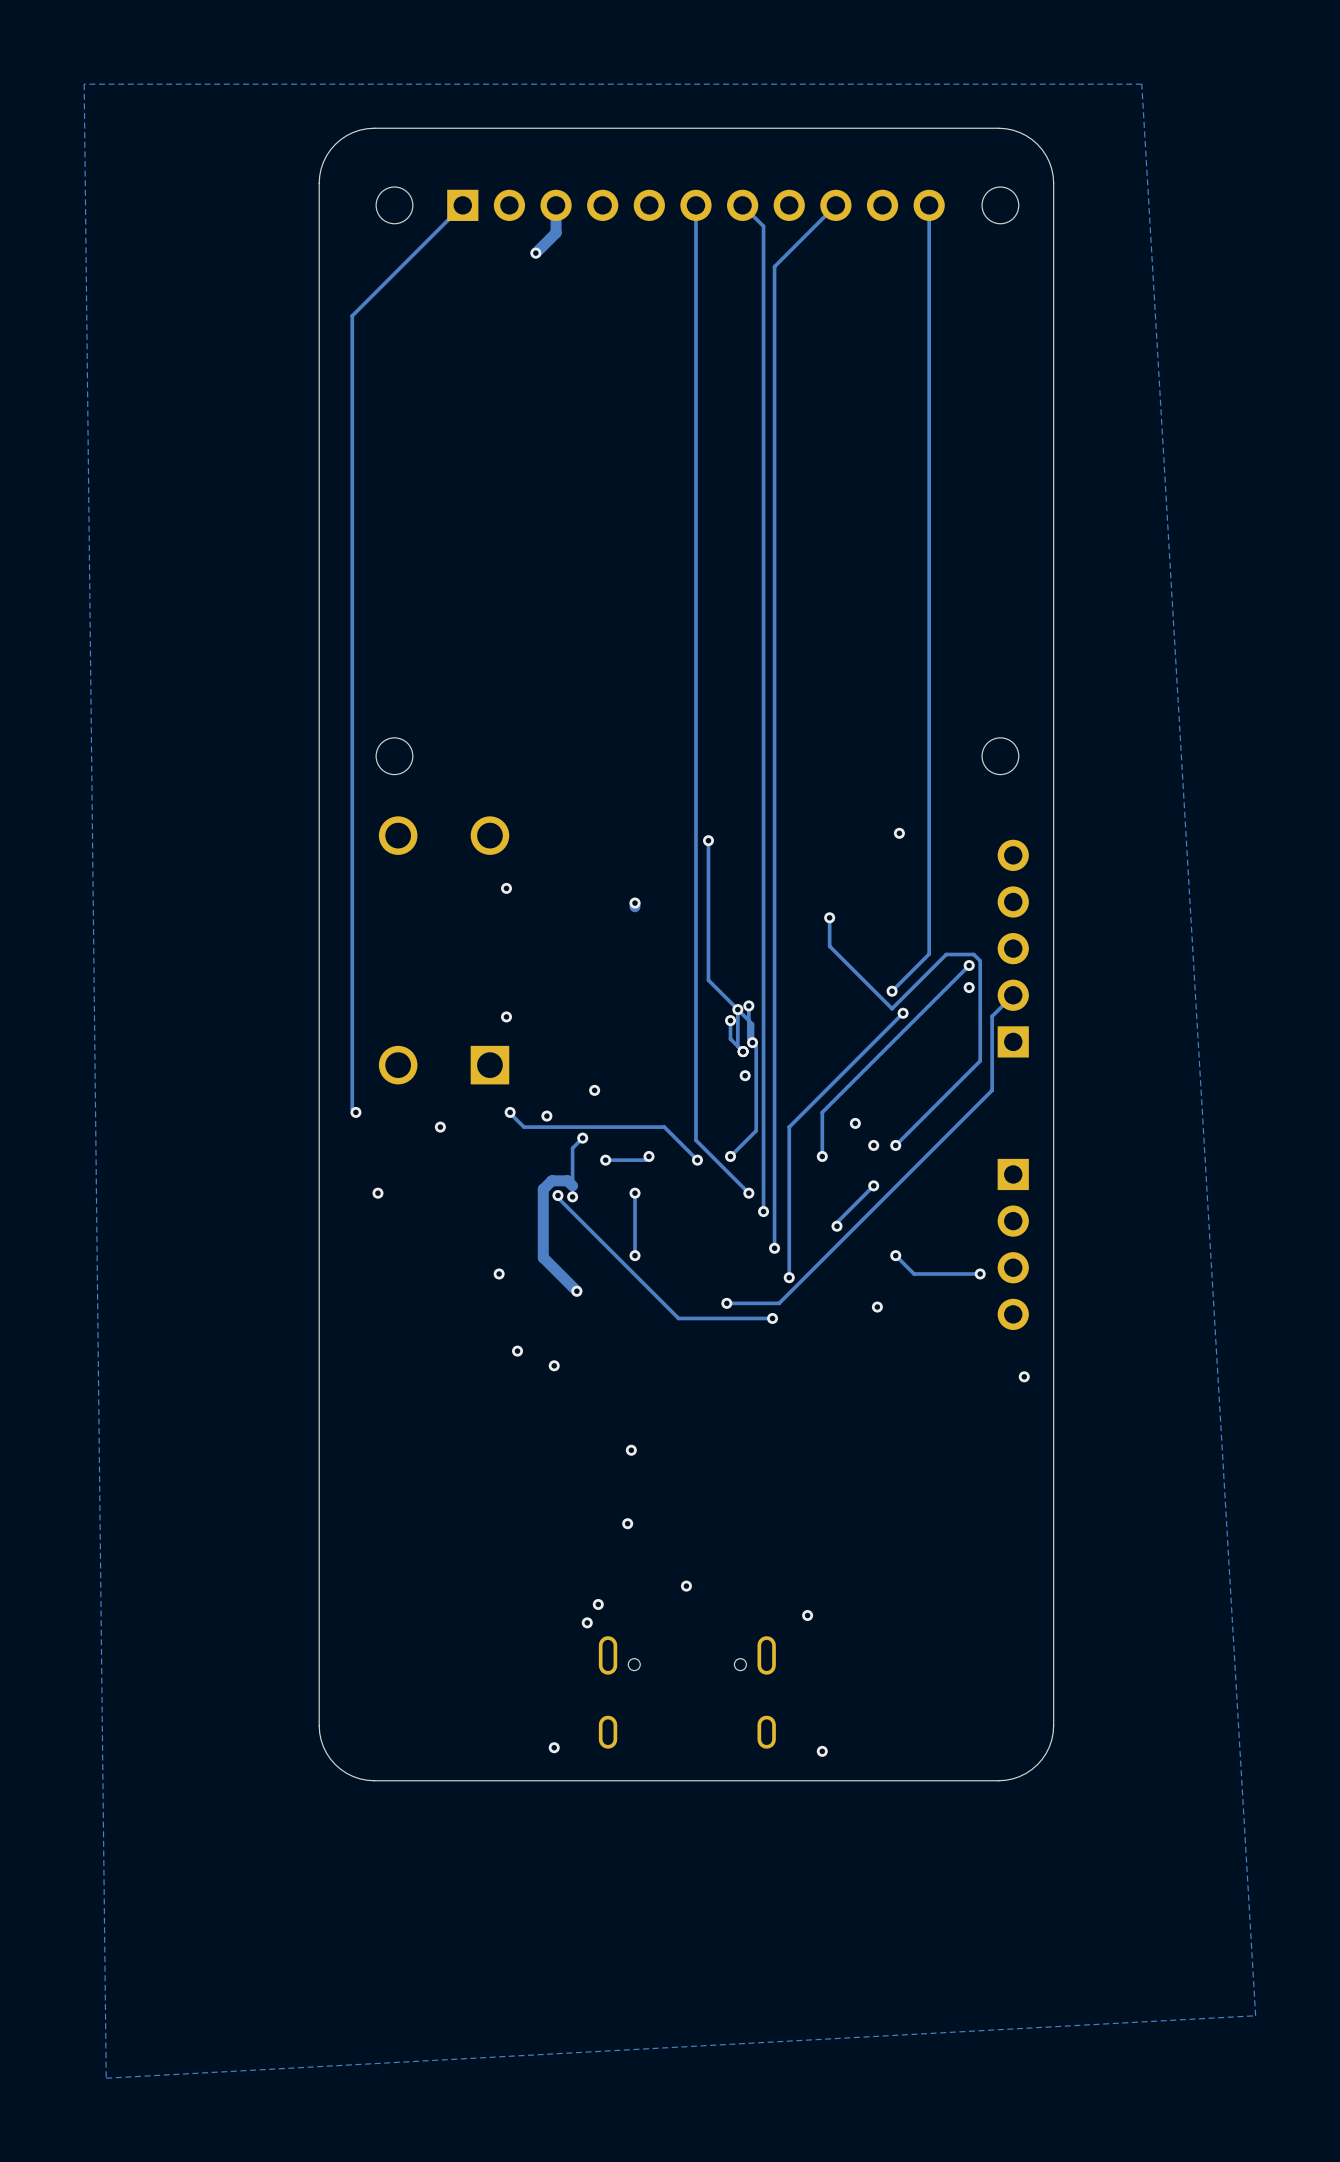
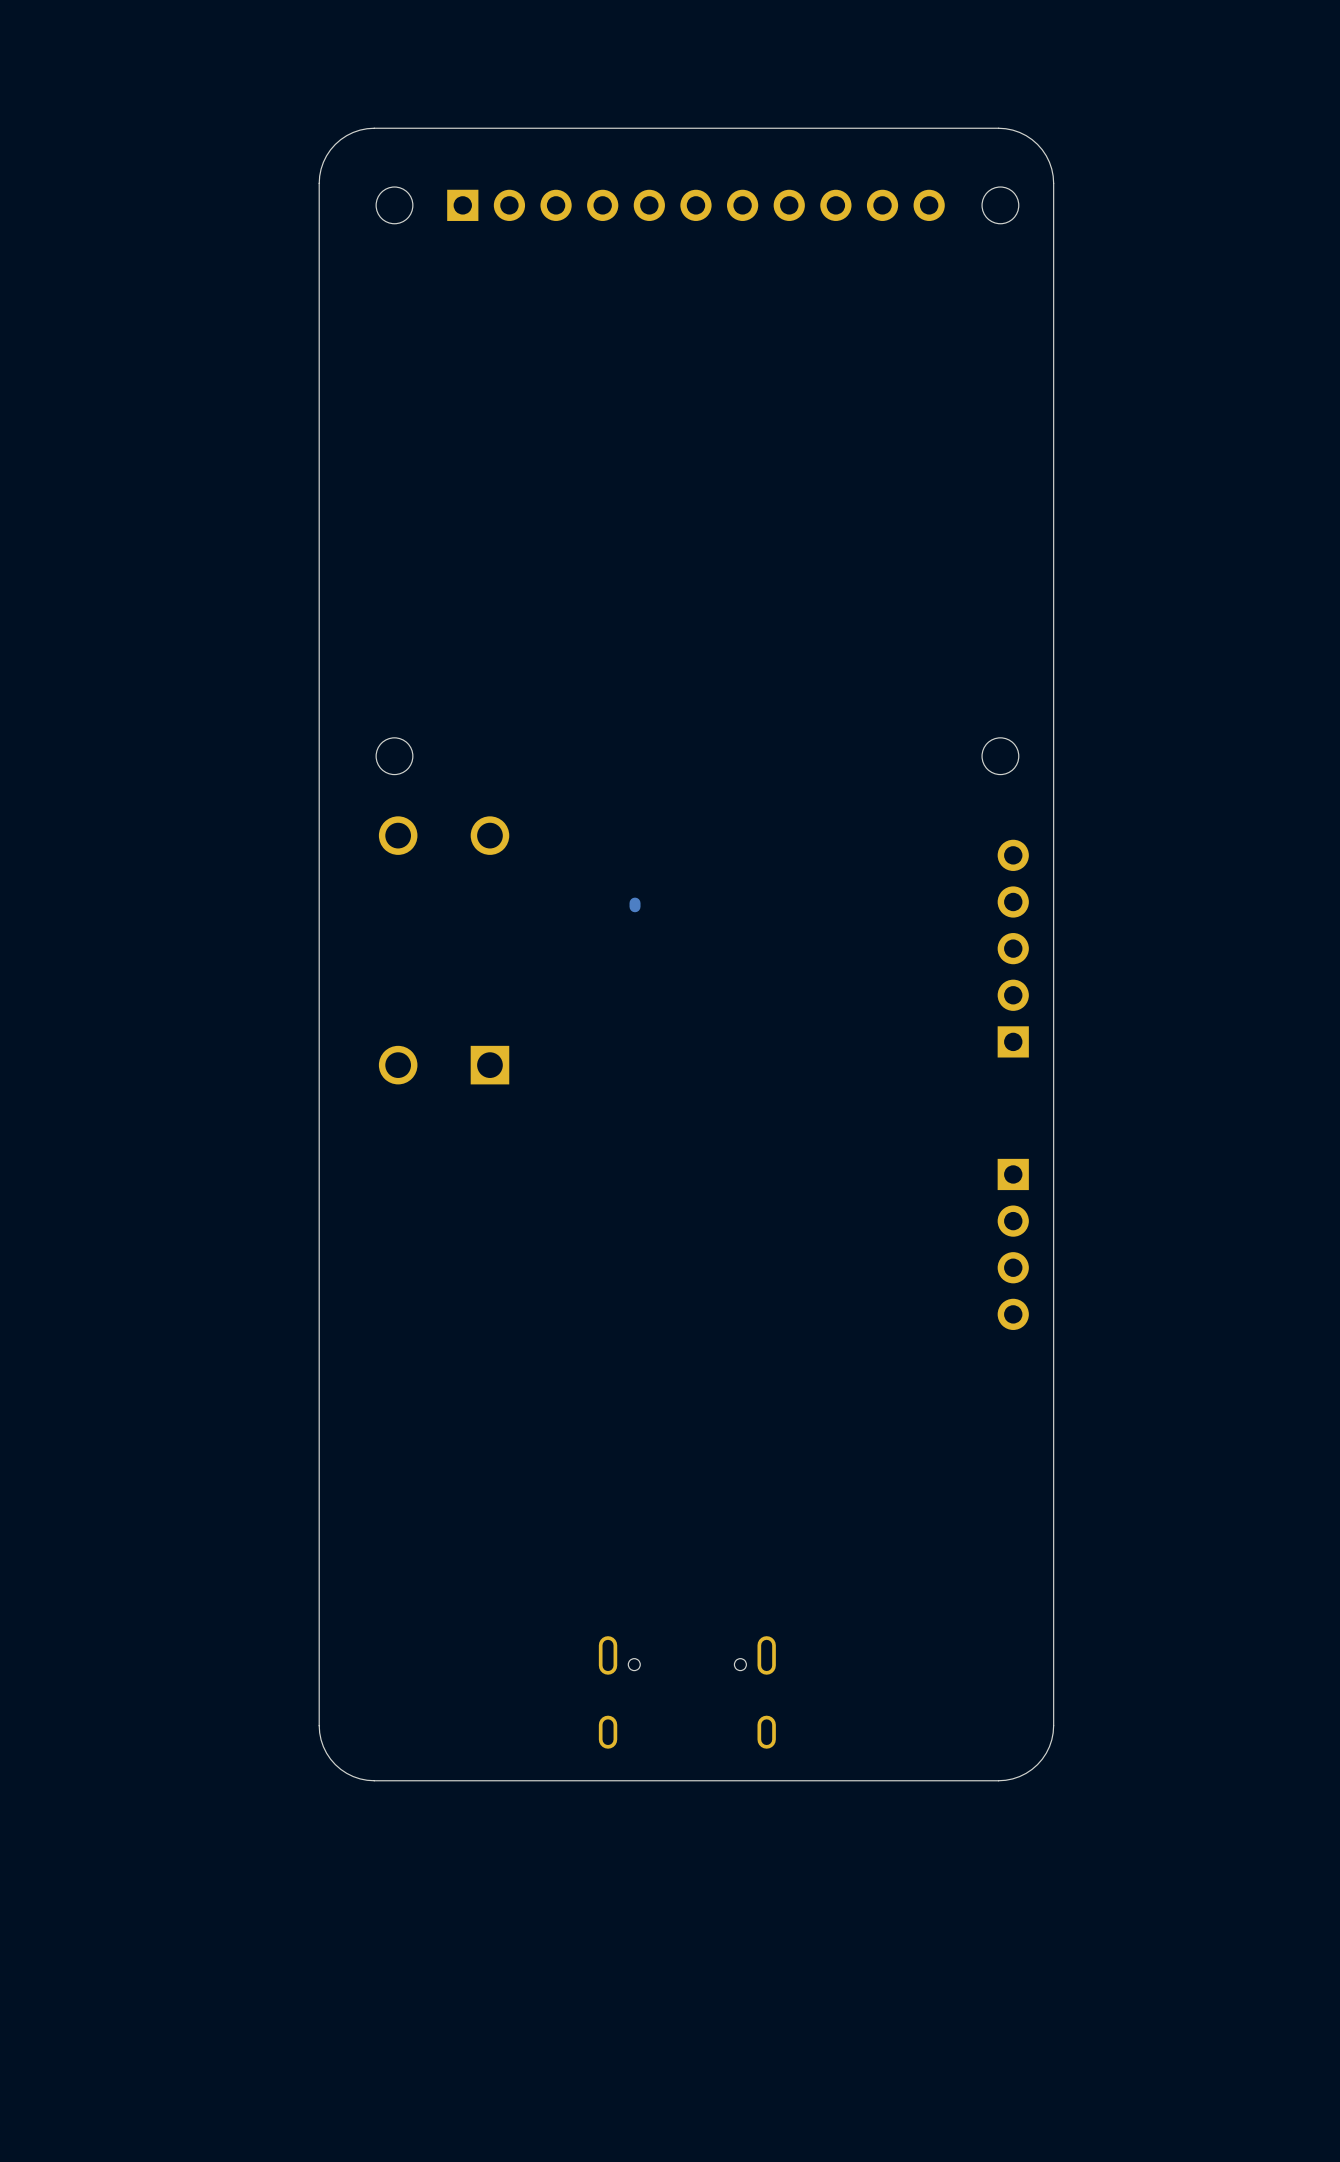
zone outline: (1141, 84) (84, 84) (106, 2078) (1255, 2015) (1141, 84) -> none
track: (462, 205) (352, 315) (352, 1108) (355, 1112) -> none
track: (556, 205) (556, 232) (535, 253) -> none
track: (695, 205) (695, 1140) (748, 1193) -> none
track: (742, 205) (763, 226) (763, 1211) -> none
track: (835, 205) (774, 266) (774, 1248) -> none
track: (929, 205) (929, 954) (892, 991) -> none
via: (535, 253) -> none
via: (899, 833) -> none
track: (708, 840) (708, 980) (752, 1024) (752, 1042) -> none
via: (708, 840) -> none
via: (506, 888) -> none
via: (635, 903) -> none
track: (829, 917) (829, 946) (892, 1008) (946, 954) (973, 954) (980, 960) (980, 1061) (895, 1145) -> none
via: (829, 917) -> none
track: (969, 965) (822, 1112) (822, 1156) -> none
via: (969, 965) -> none
via: (969, 987) -> none
via: (892, 991) -> none
track: (1013, 995) (992, 1016) (992, 1090) (779, 1303) (726, 1303) -> none
track: (748, 1005) (748, 1038) (756, 1046) (756, 1130) (730, 1156) -> none
via: (748, 1005) -> none
track: (737, 1009) (737, 1046) -> none
via: (737, 1009) -> none
track: (903, 1013) (789, 1127) (789, 1277) -> none
via: (903, 1013) -> none
via: (506, 1016) -> none
track: (730, 1020) (730, 1038) (743, 1051) -> none
via: (730, 1020) -> none
via: (752, 1042) -> none
via: (743, 1051) -> none
via: (745, 1075) -> none
via: (594, 1090) -> none
via: (355, 1112) -> none
track: (510, 1112) (523, 1127) (664, 1127) (697, 1160) -> none
via: (510, 1112) -> none
via: (546, 1116) -> none
via: (855, 1123) -> none
via: (440, 1127) -> none
track: (582, 1138) (572, 1148) (572, 1196) -> none
via: (582, 1138) -> none
via: (873, 1145) -> none
via: (895, 1145) -> none
track: (649, 1156) (645, 1160) (605, 1160) -> none
via: (649, 1156) -> none
via: (730, 1156) -> none
via: (822, 1156) -> none
via: (605, 1160) -> none
via: (697, 1160) -> none
track: (572, 1185) (567, 1180) (551, 1180) (543, 1189) (543, 1257) (576, 1291) -> none
track: (873, 1185) (836, 1222) (836, 1226) -> none
via: (873, 1185) -> none
via: (377, 1193) -> none
track: (635, 1193) (635, 1255) -> none
via: (635, 1193) -> none
via: (748, 1193) -> none
track: (557, 1195) (557, 1197) (678, 1318) (772, 1318) -> none
via: (557, 1195) -> none
via: (572, 1196) -> none
via: (763, 1211) -> none
via: (836, 1226) -> none
via: (774, 1248) -> none
via: (635, 1255) -> none
track: (895, 1255) (914, 1273) (980, 1273) -> none
via: (895, 1255) -> none
via: (499, 1273) -> none
via: (980, 1273) -> none
via: (789, 1277) -> none
via: (576, 1291) -> none
via: (726, 1303) -> none
via: (877, 1307) -> none
via: (772, 1318) -> none
via: (517, 1351) -> none
via: (554, 1365) -> none
via: (1024, 1376) -> none
via: (631, 1450) -> none
via: (627, 1523) -> none
via: (686, 1586) -> none
via: (598, 1604) -> none
via: (807, 1615) -> none
via: (587, 1622) -> none
via: (554, 1747) -> none
via: (822, 1751) -> none

